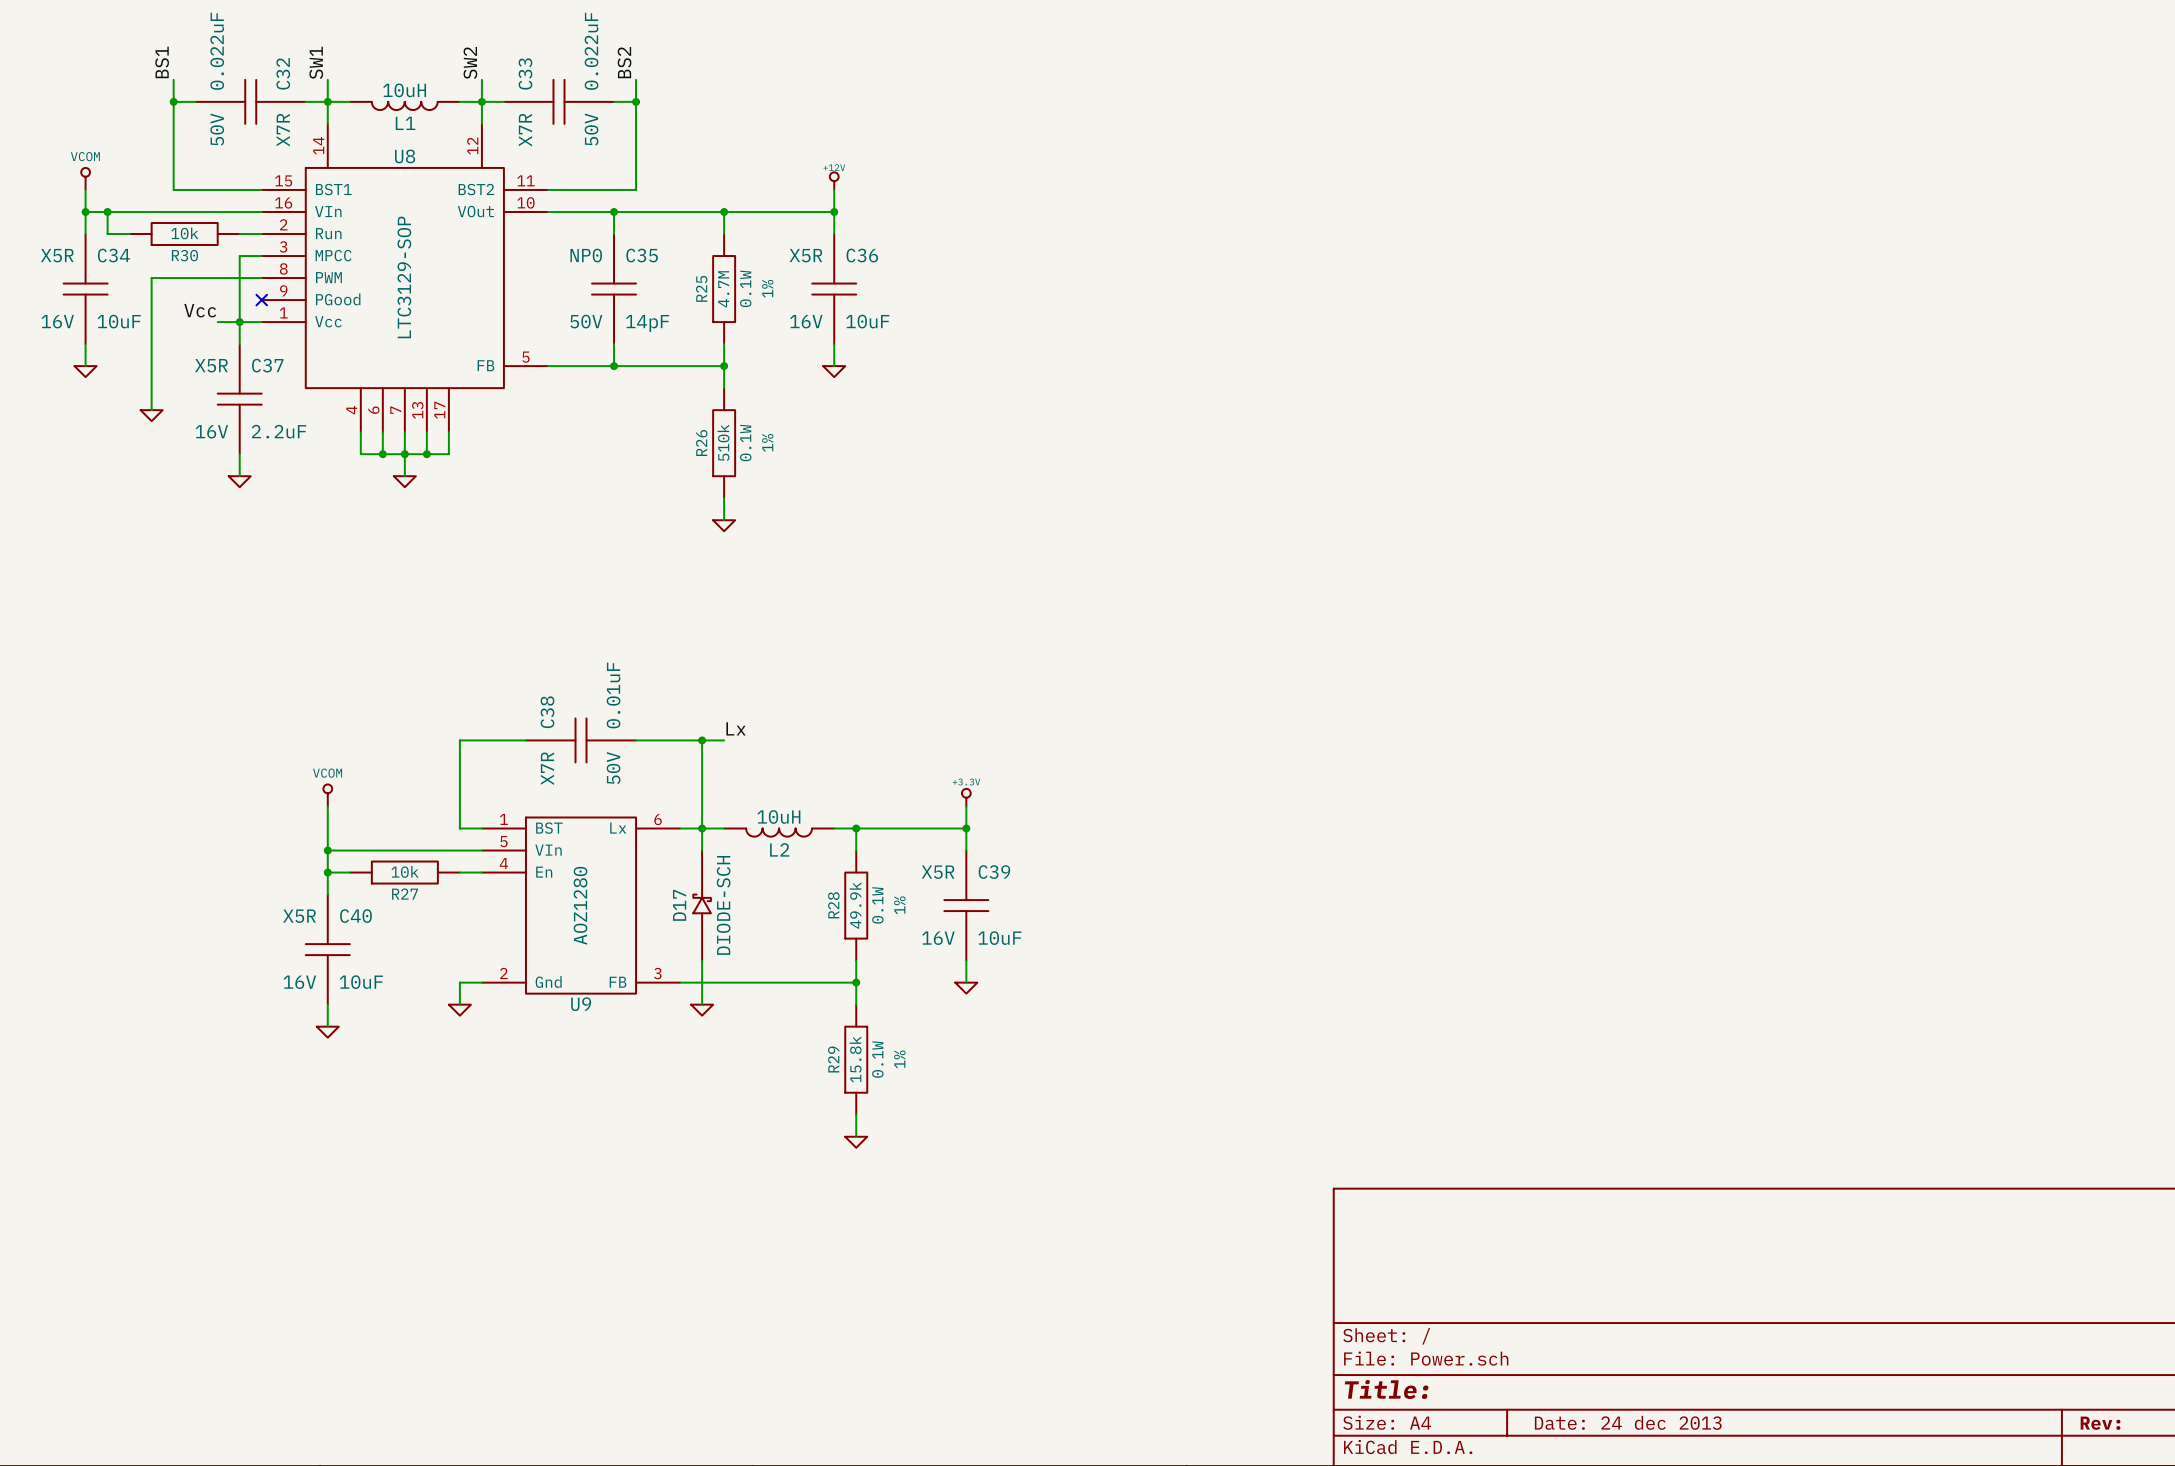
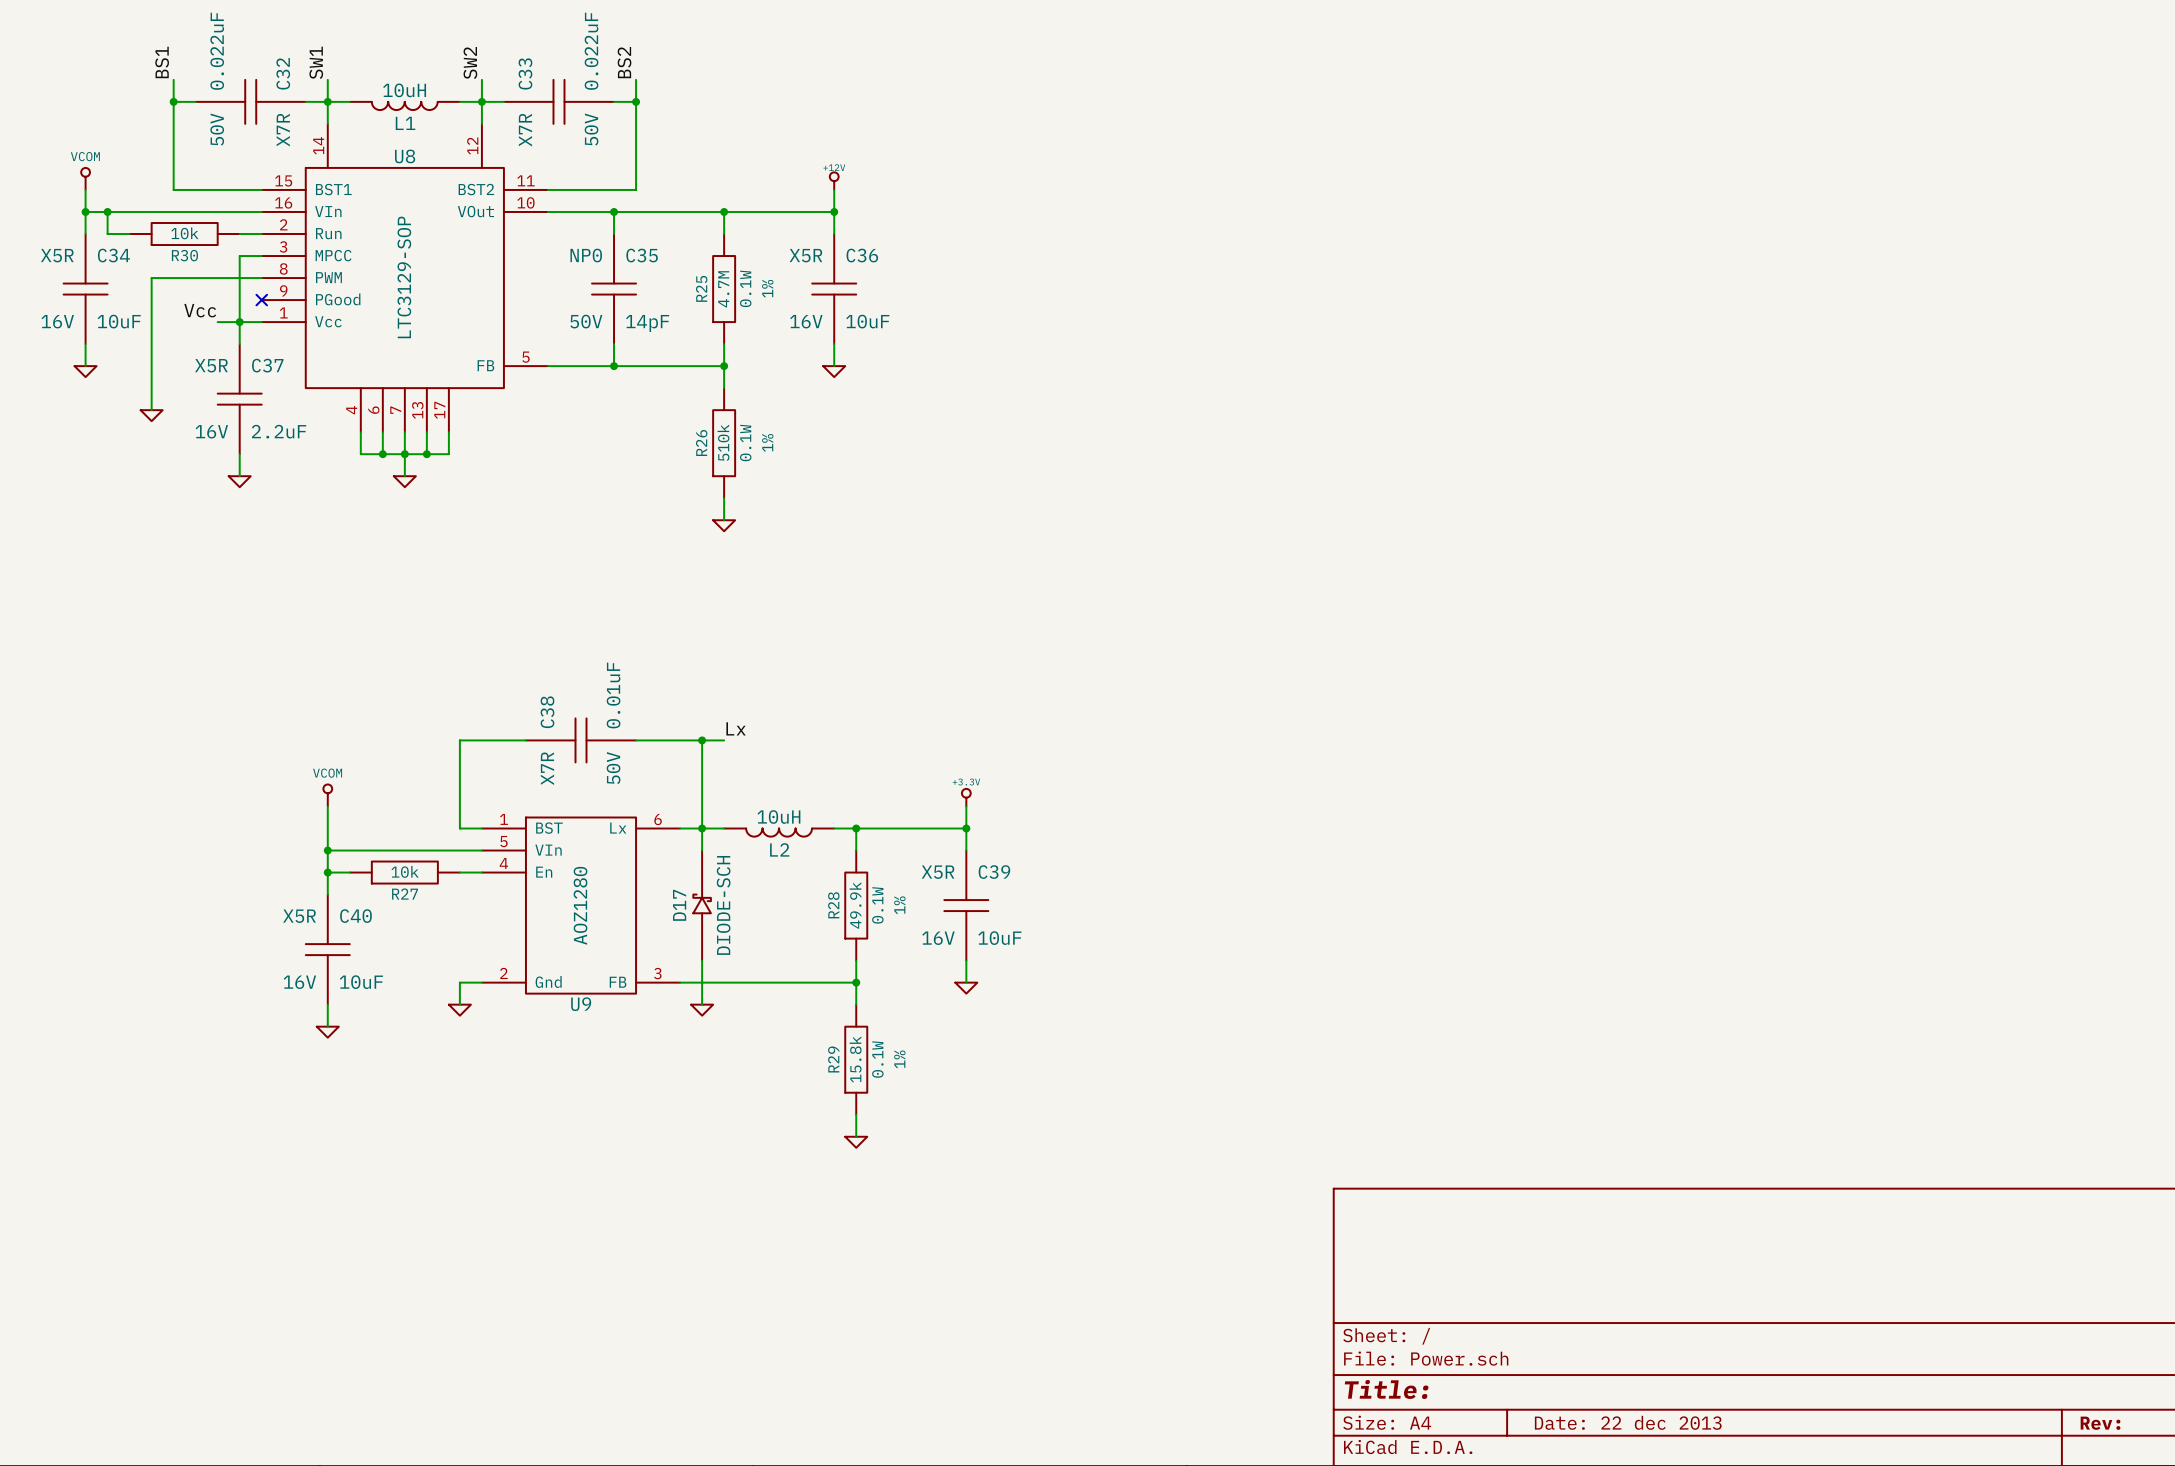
title block: Date: 24 dec 2013 (1628, 1422) -> Date: 22 dec 2013 (1628, 1422)

